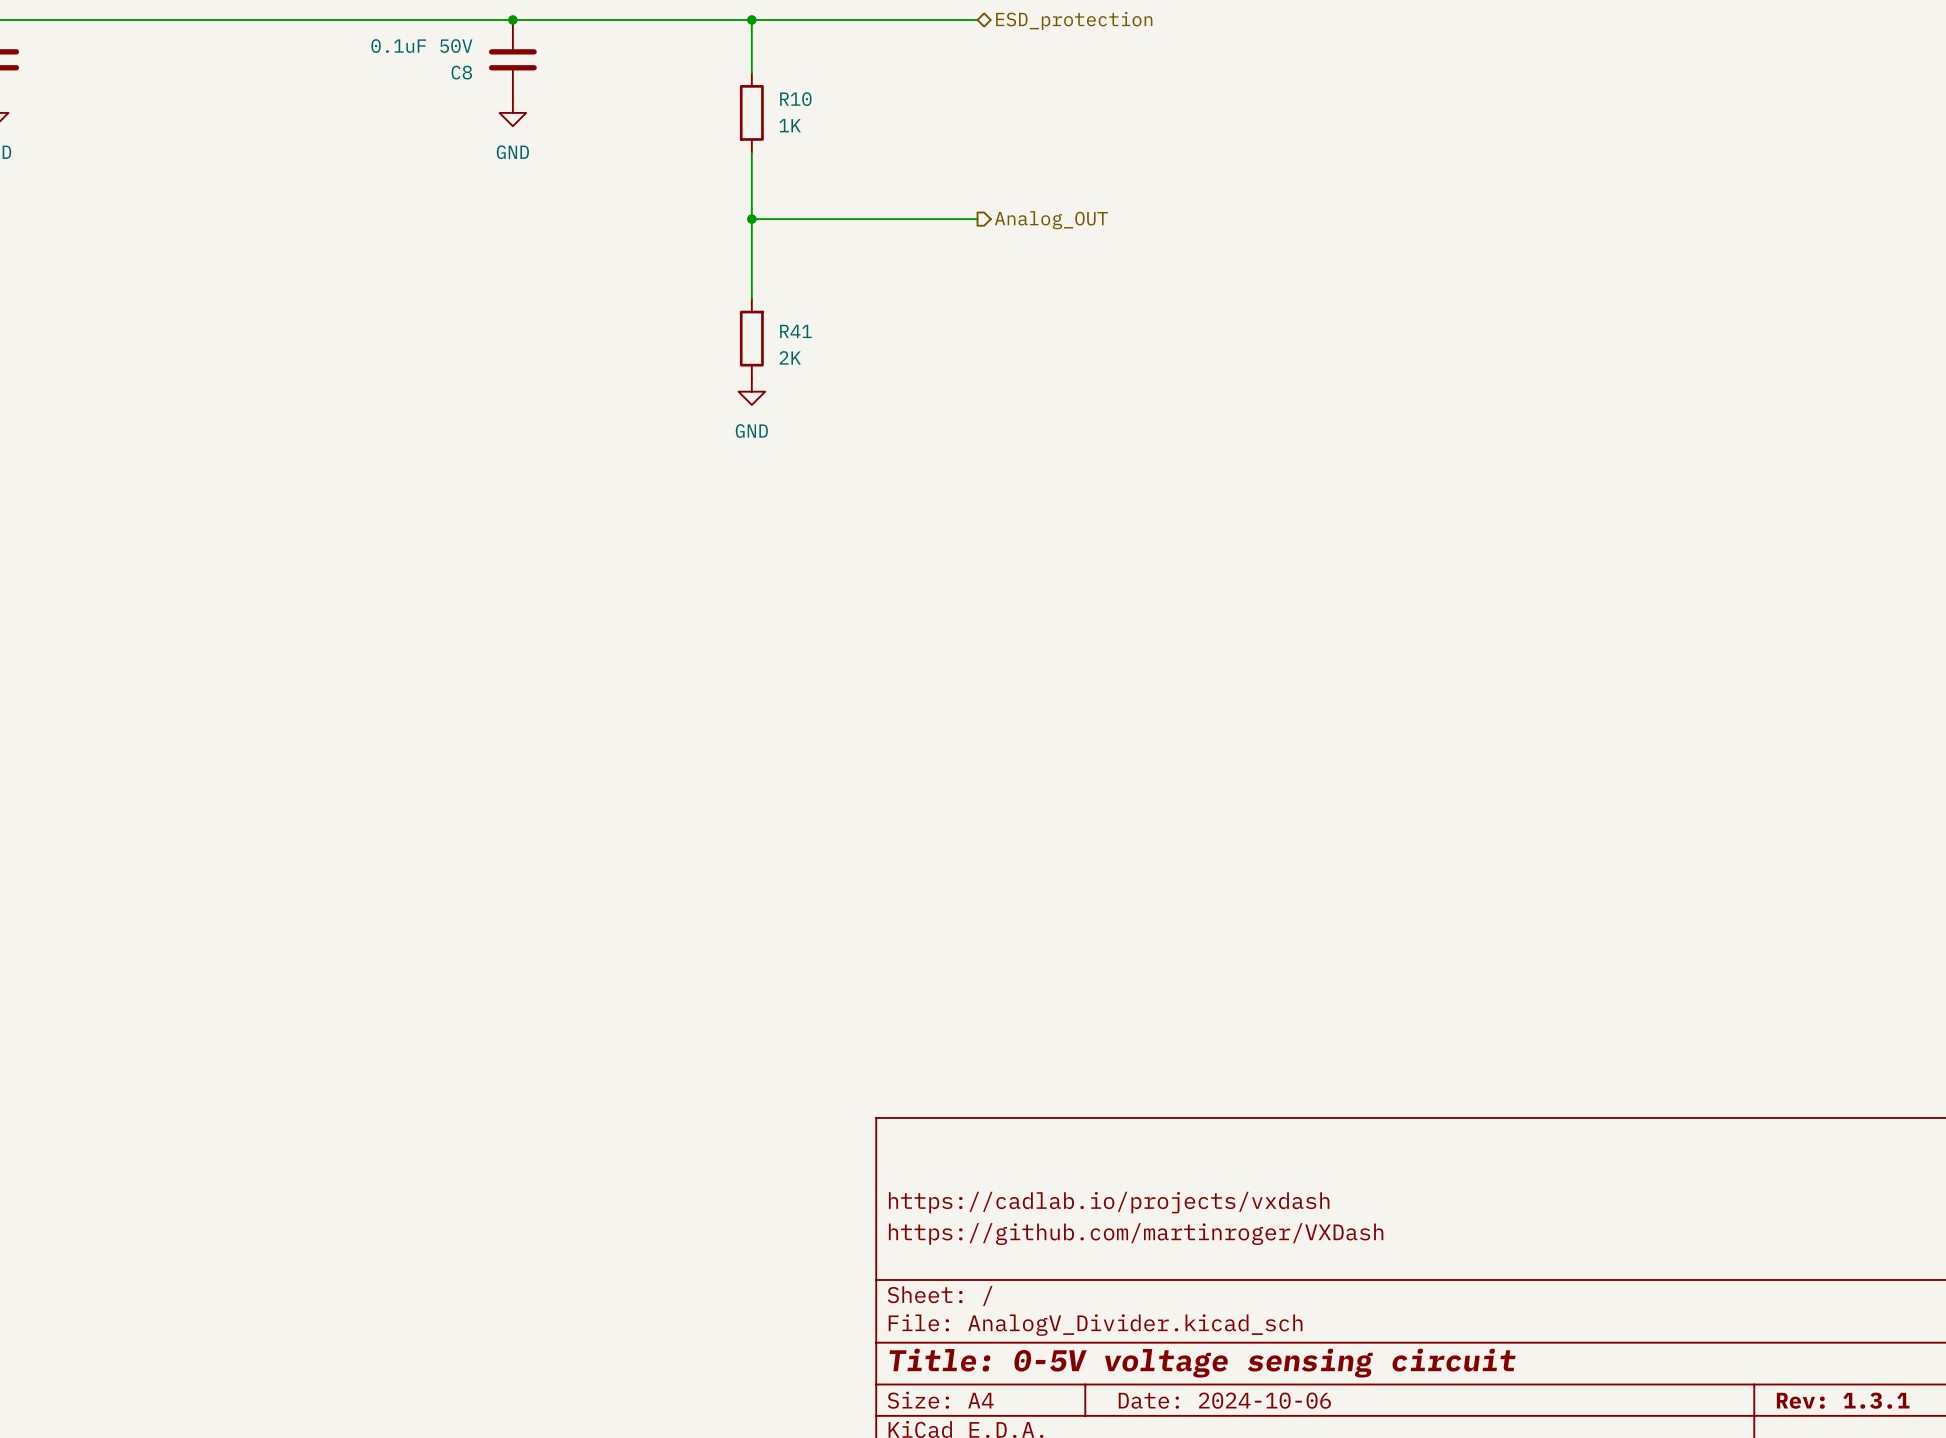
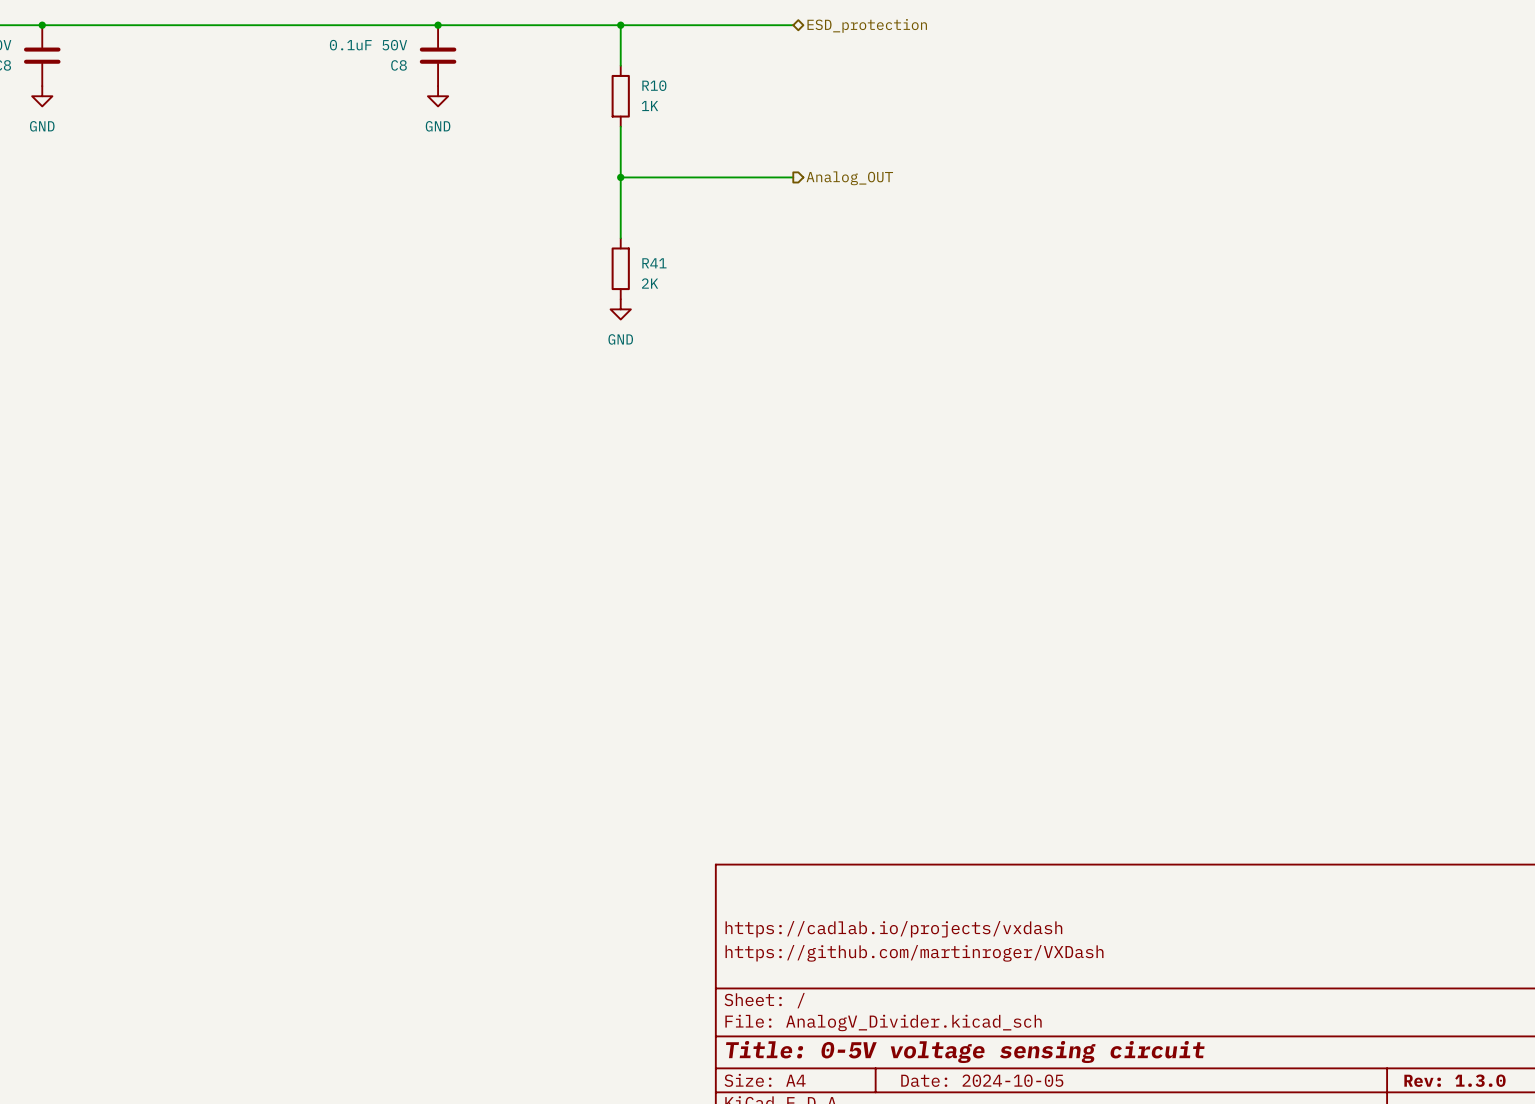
title block: Date: 2024-10-06 (1224, 1400) -> Date: 2024-10-05 (982, 1080)
title block: Rev: 1.3.1 (1843, 1400) -> Rev: 1.3.0 (1455, 1080)

